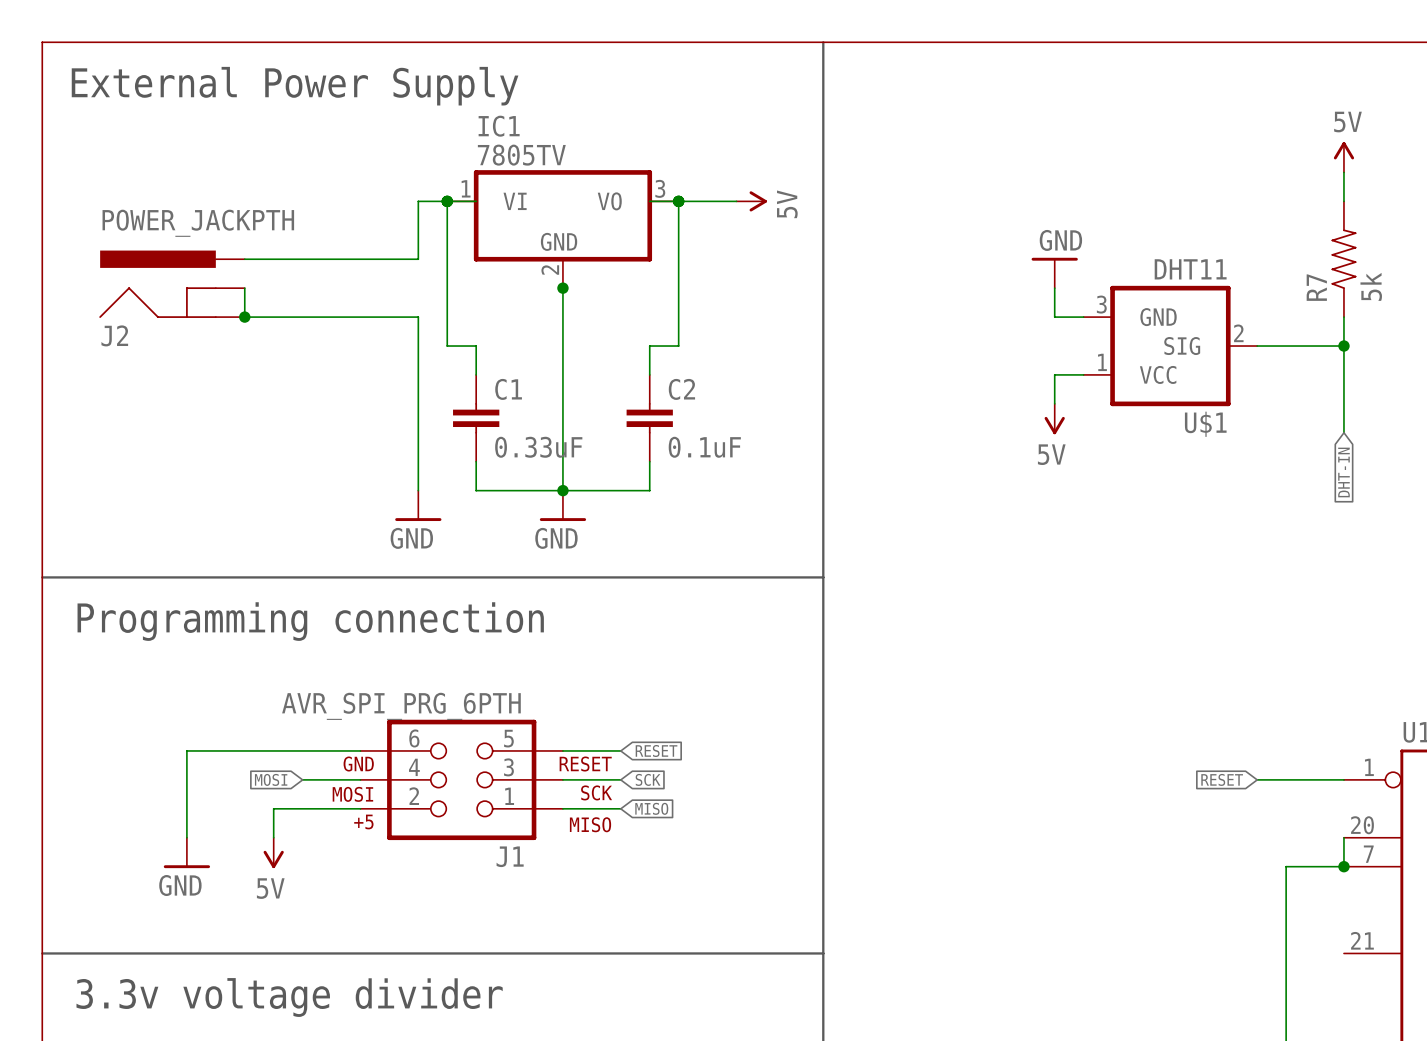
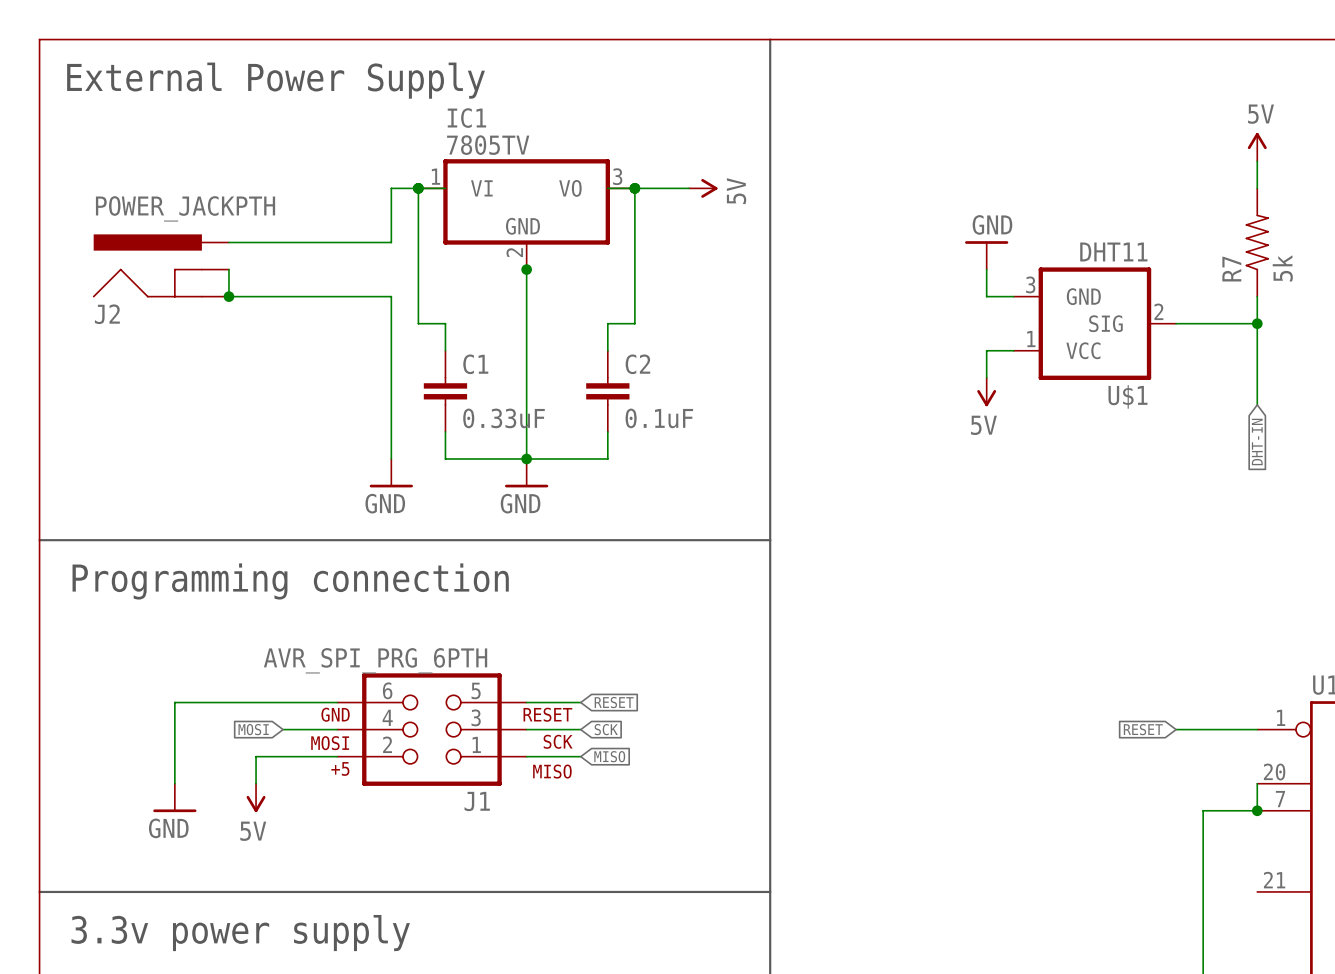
text: 3.3v voltage divider (289, 997) -> 3.3v power supply (240, 933)

